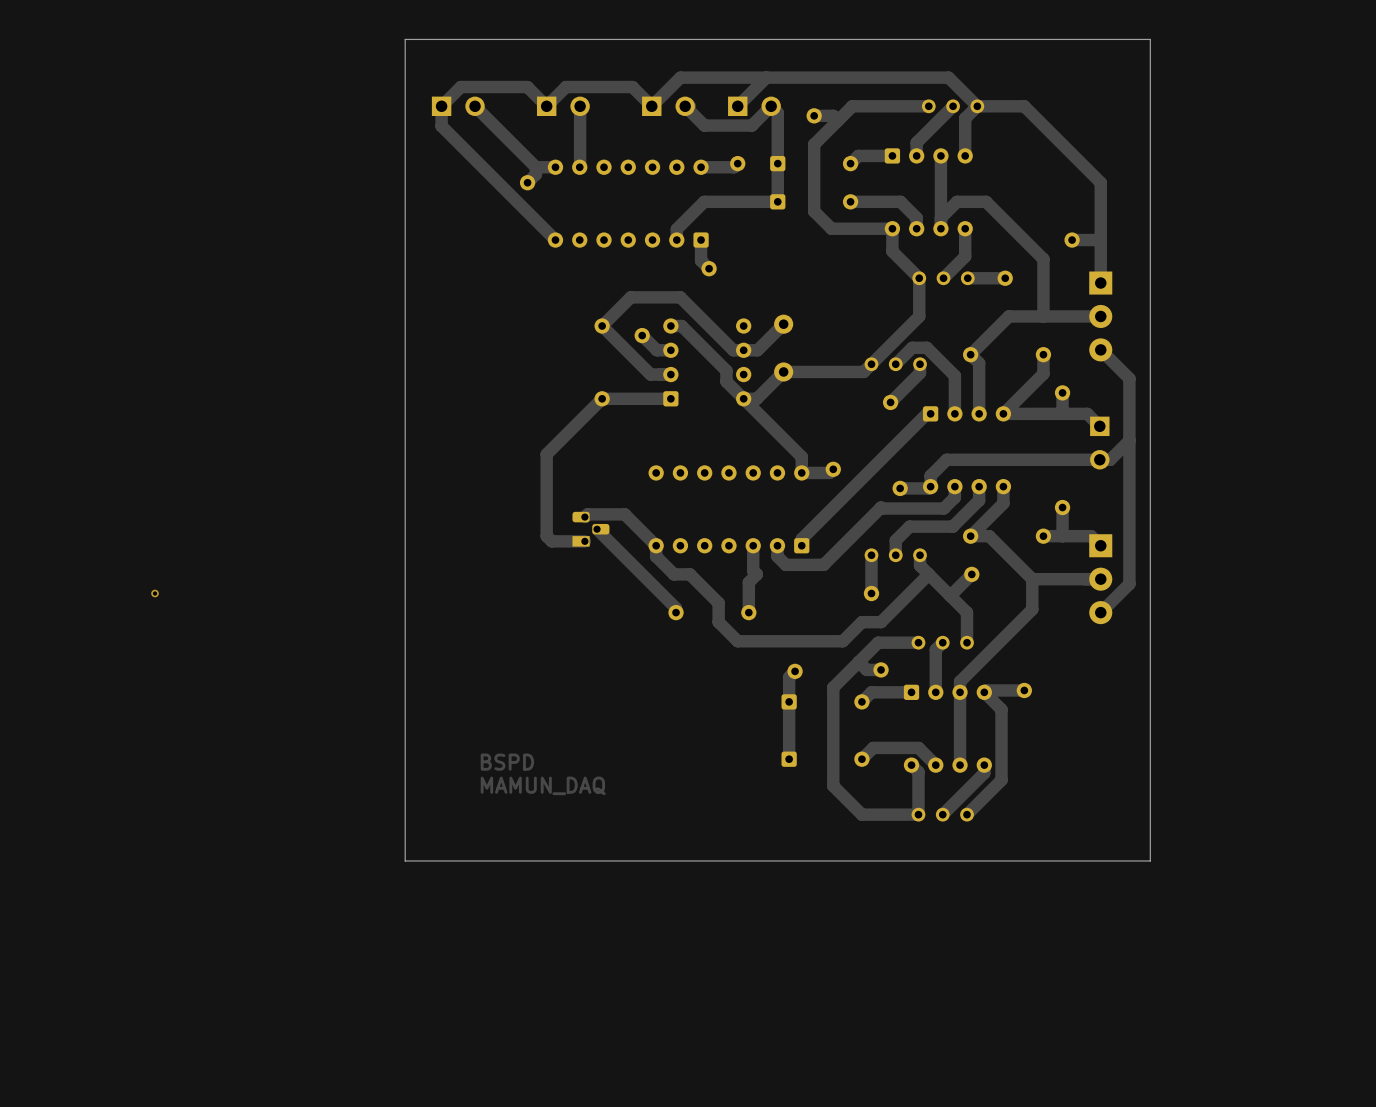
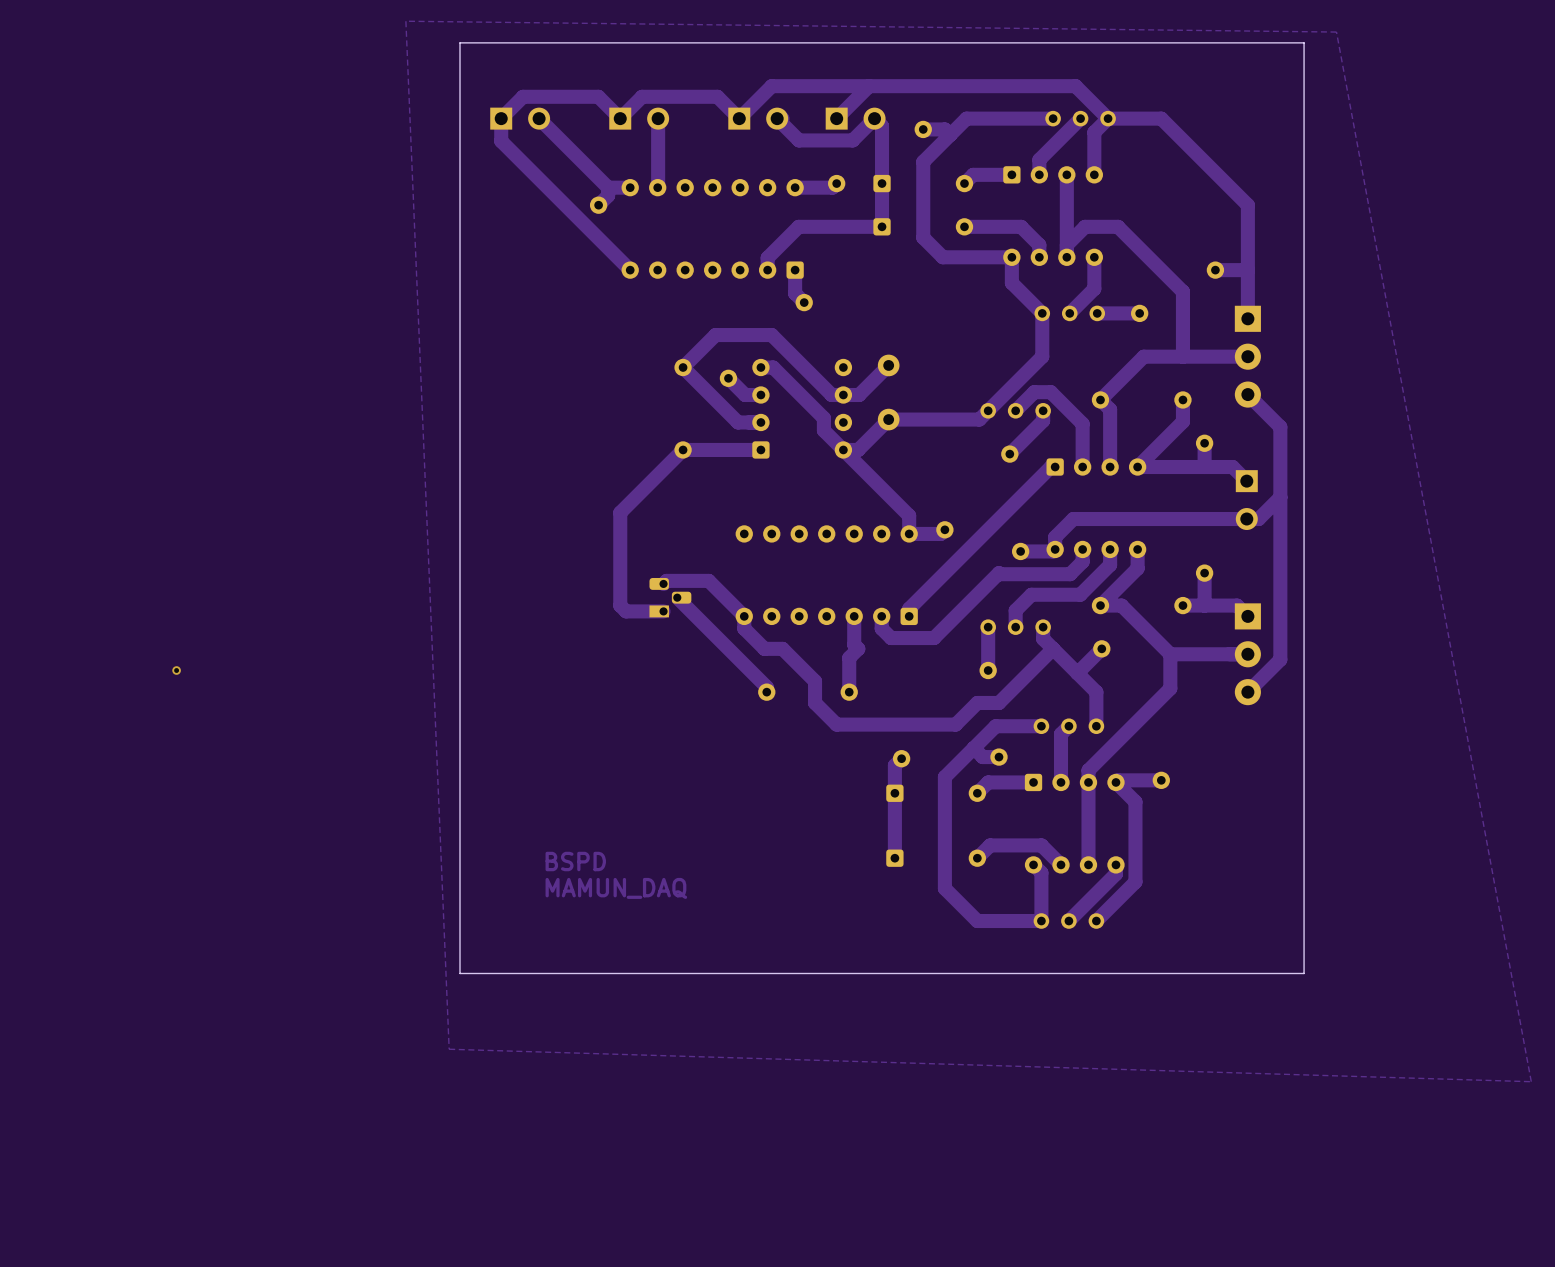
zone outline: none -> (405, 21) (1336, 32) (1531, 1081) (449, 1049) (405, 21)

